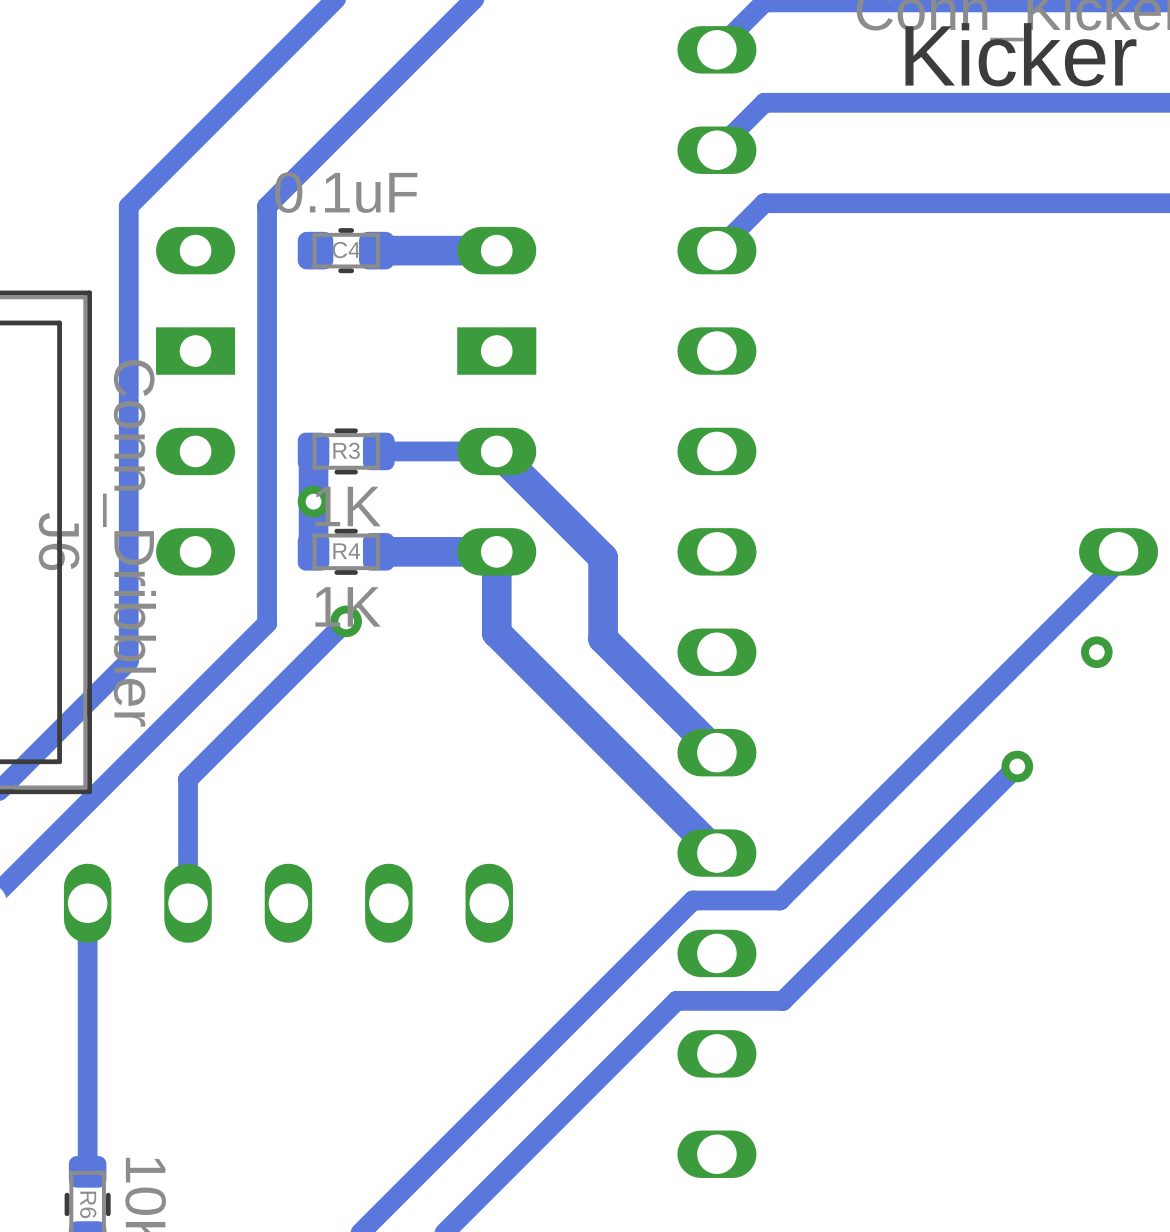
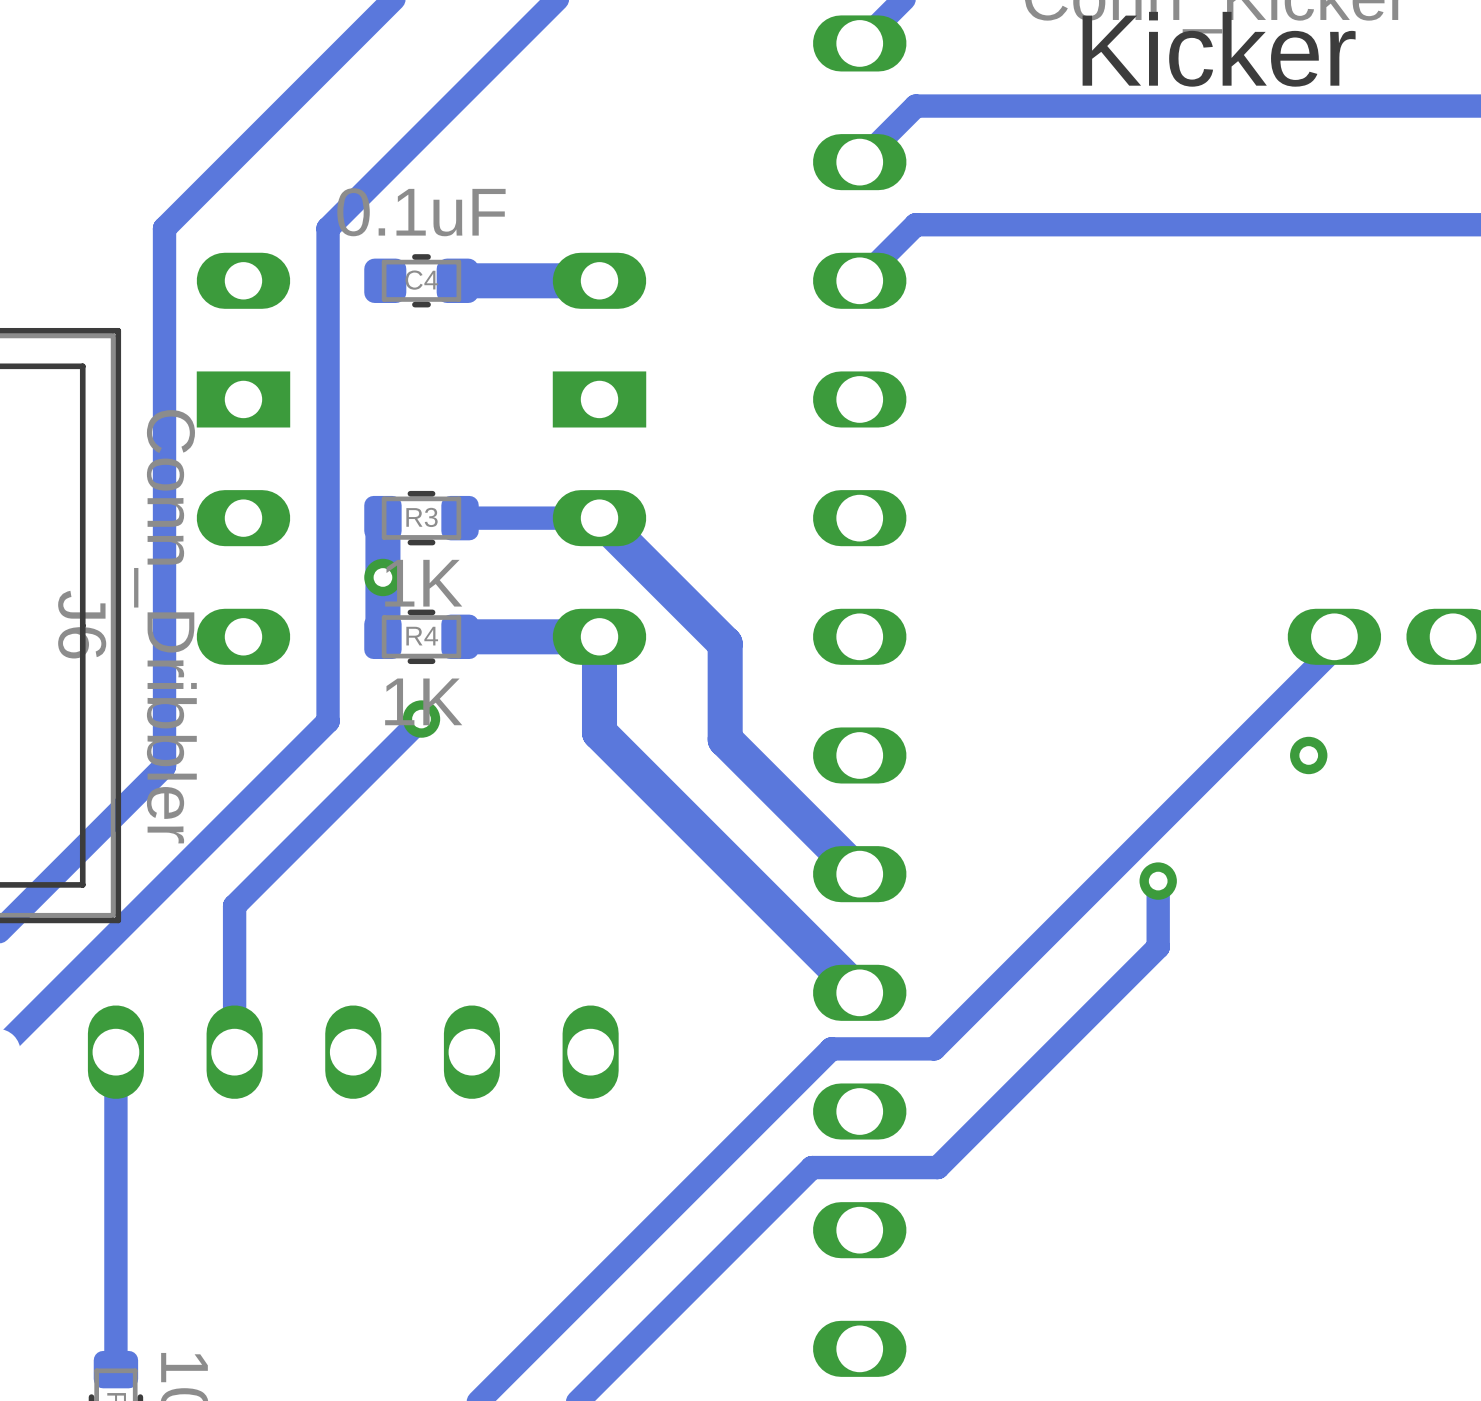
track: (1017, 766) (969, 814) -> (1158, 881) (1158, 947)
via position: (1017, 766) -> (1158, 881)

